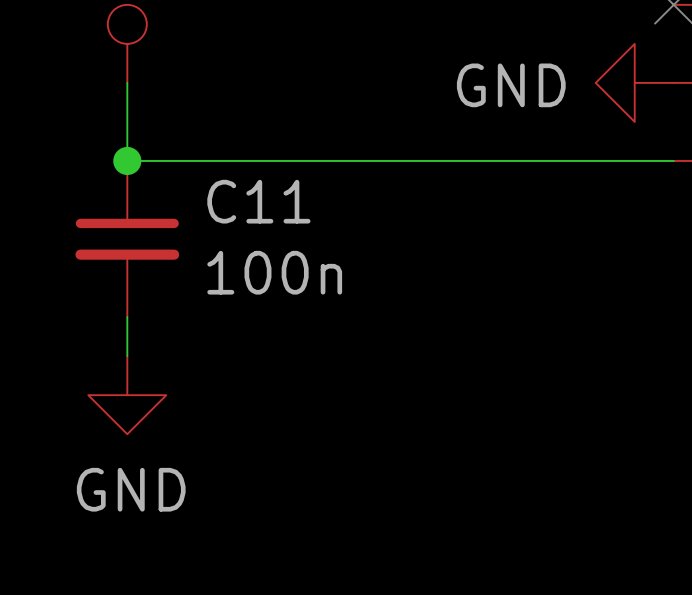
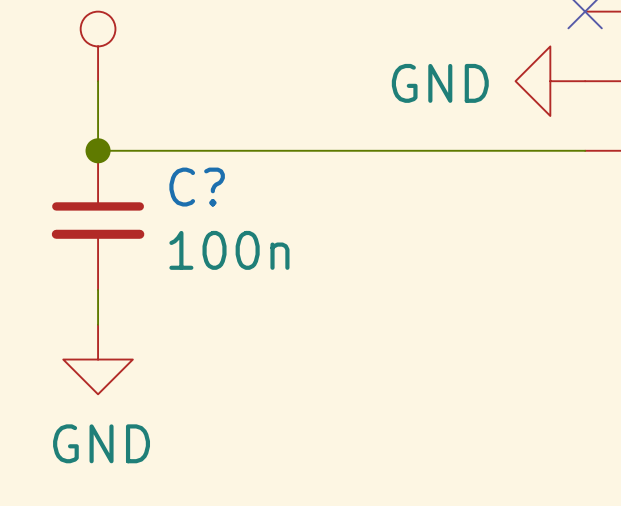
C11 name: C11 (258, 201) -> C? (197, 187)

